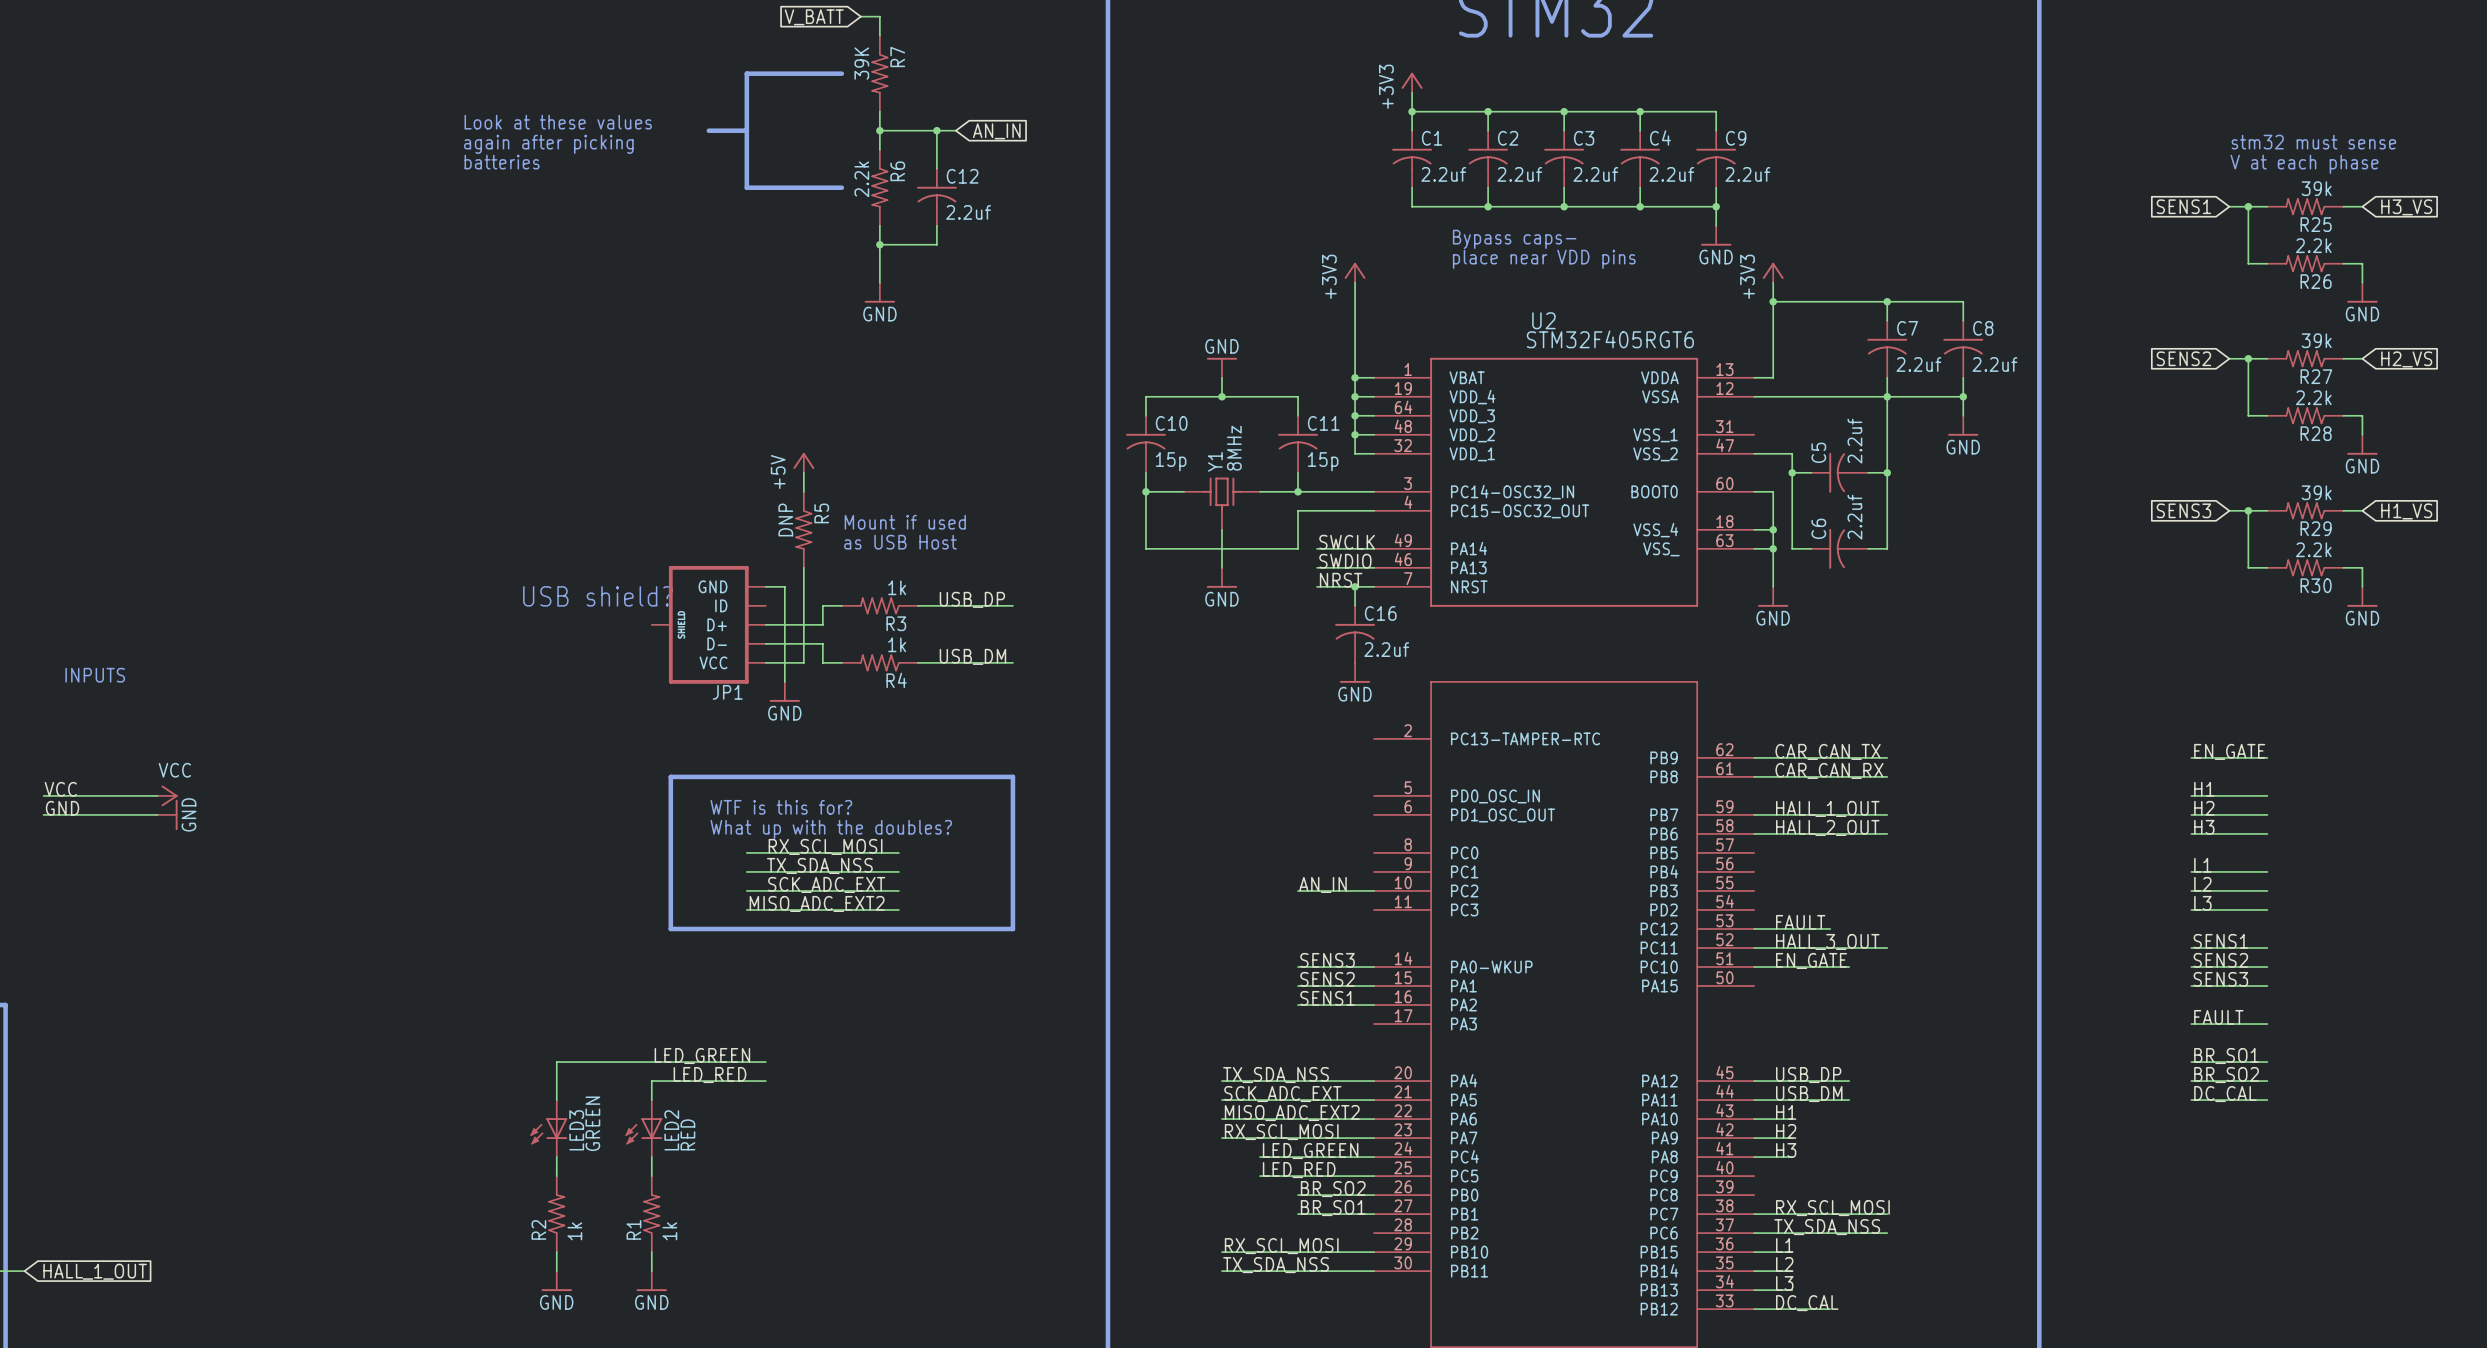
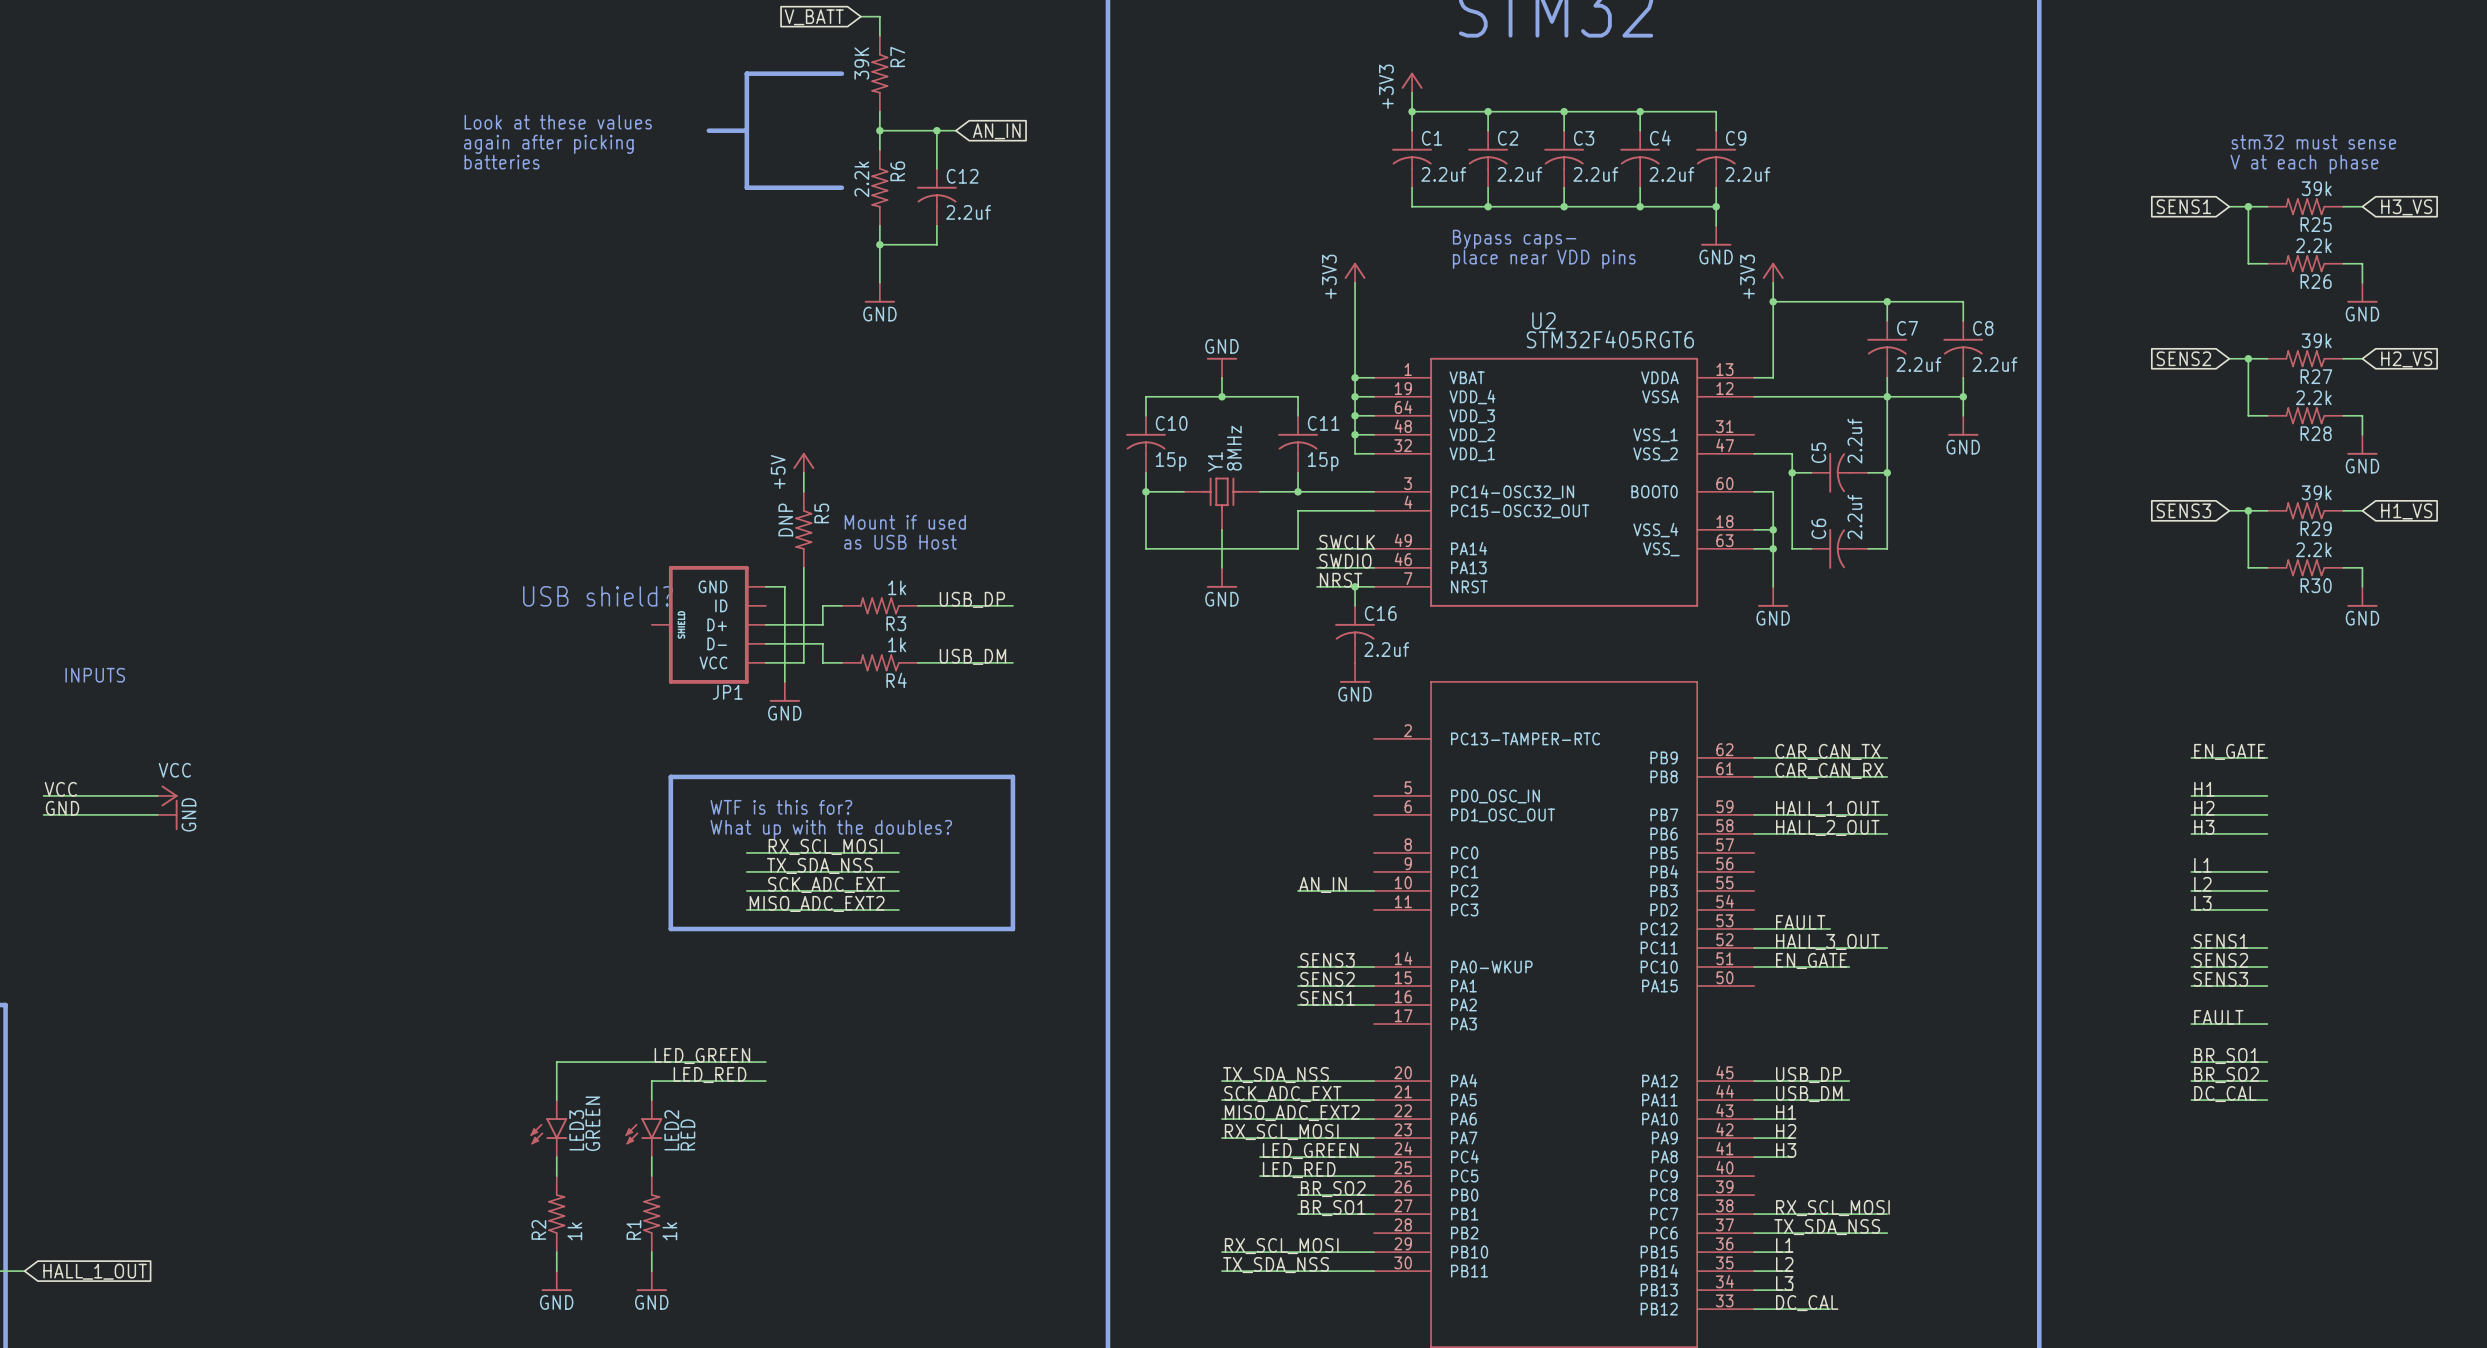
LED3 symbol: [530, 1100, 568, 1158] -> [530, 1100, 568, 1158]
LED2 symbol: [625, 1100, 663, 1158] -> [625, 1100, 663, 1158]

